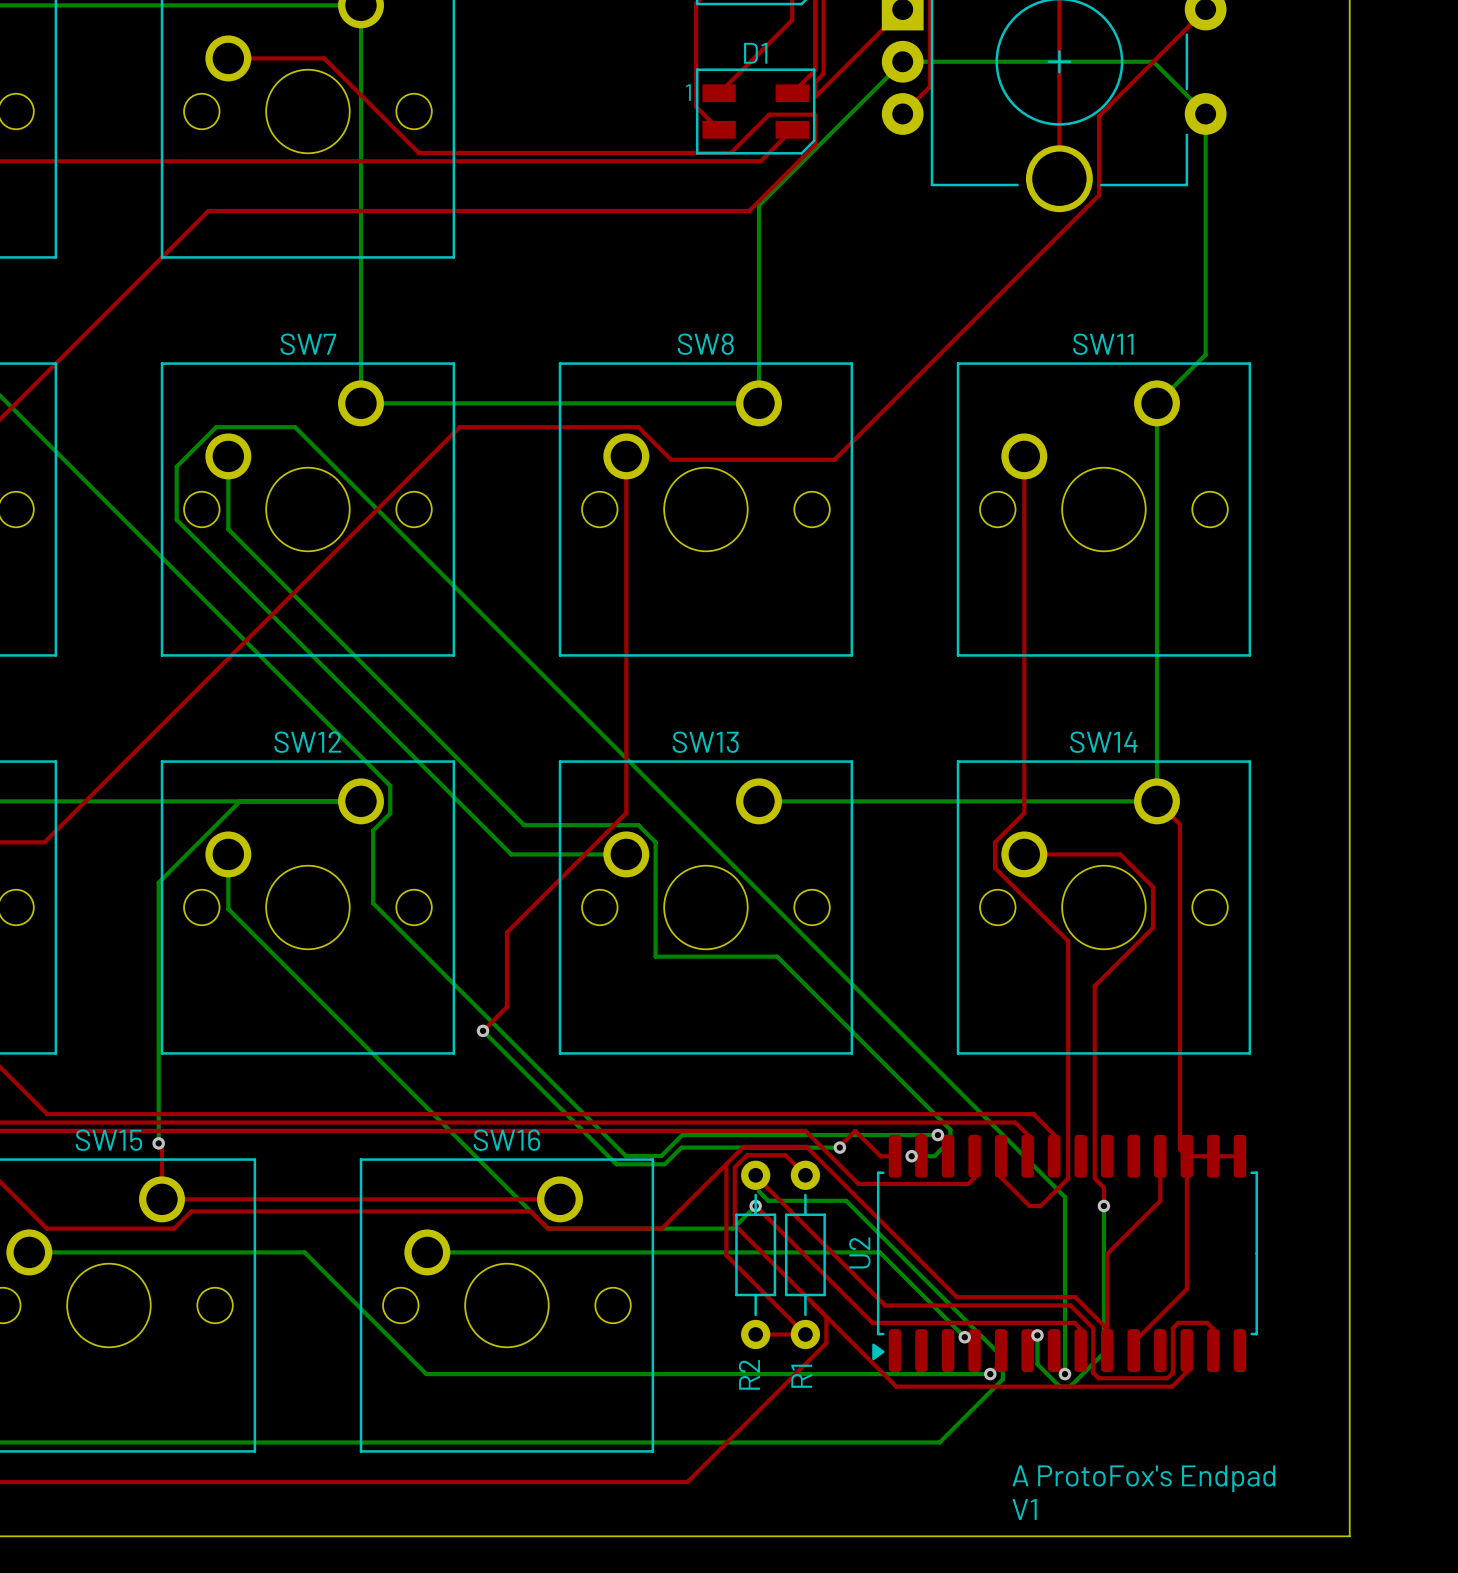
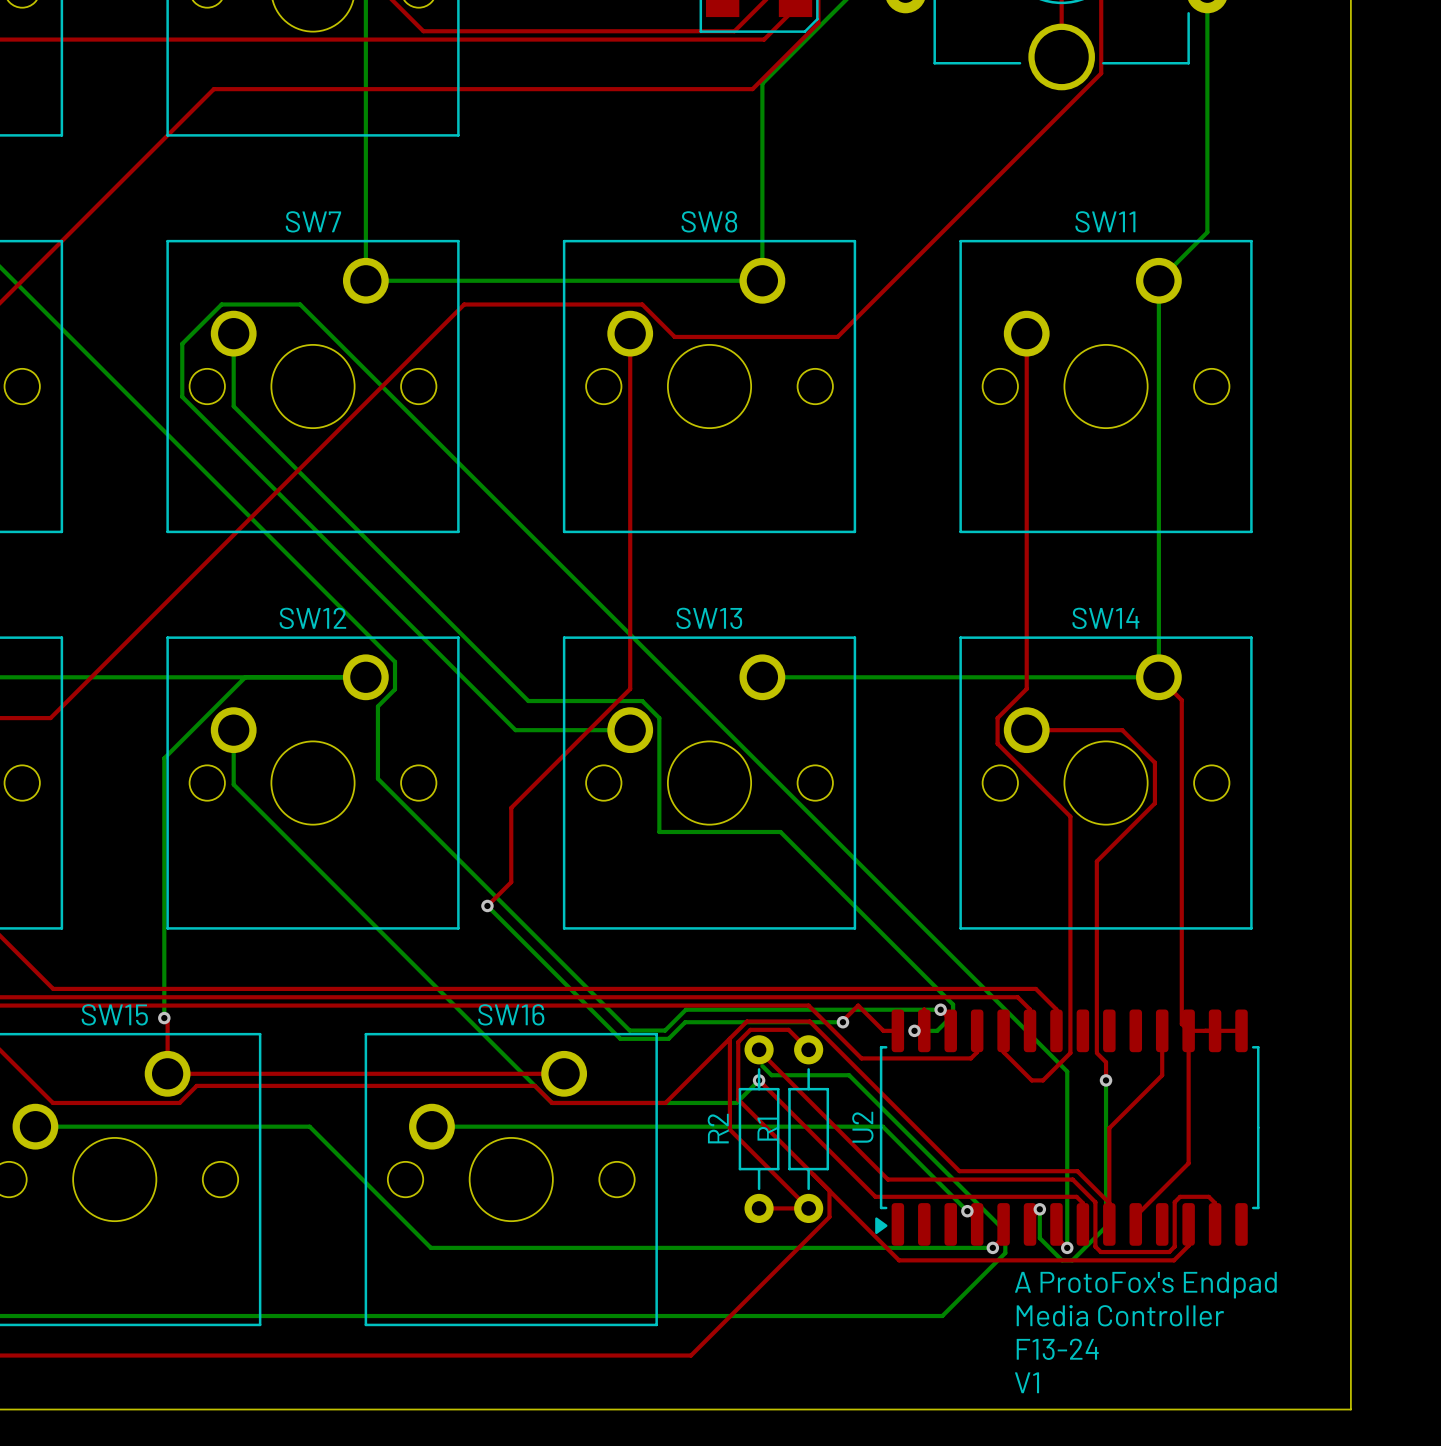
R2 name position: R2 (749, 1374) -> R2 (718, 1128)
R1 name position: R1 (801, 1376) -> R1 (767, 1129)
text: none -> A ProtoFox's Endpad (1145, 1285)
text: none -> Media Controller (1120, 1315)
text: A ProtoFox's Endpad (1143, 1478) -> F13-24 (1057, 1349)

